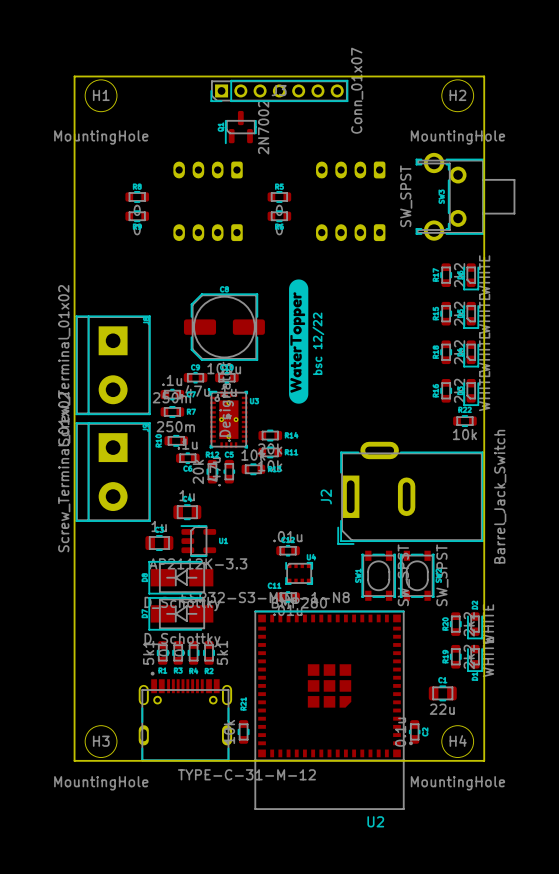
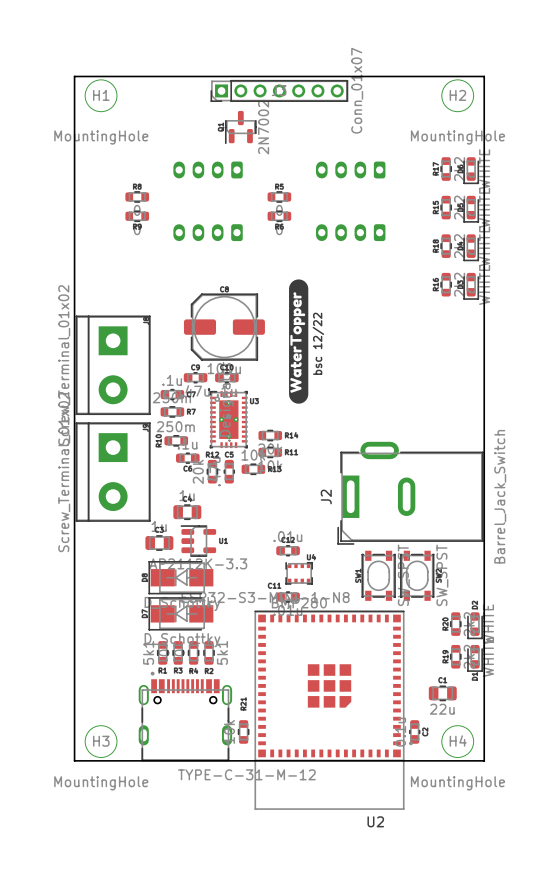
part: SW_SPST (465, 196) -> none
part position: (446, 275) -> (446, 169)
part position: (471, 276) -> (471, 170)
part position: (446, 313) -> (446, 207)
part position: (471, 315) -> (471, 209)
part position: (446, 352) -> (446, 246)
part position: (471, 353) -> (471, 247)
part position: (446, 390) -> (446, 284)
part position: (471, 392) -> (471, 286)
part: 10k (464, 421) -> none

